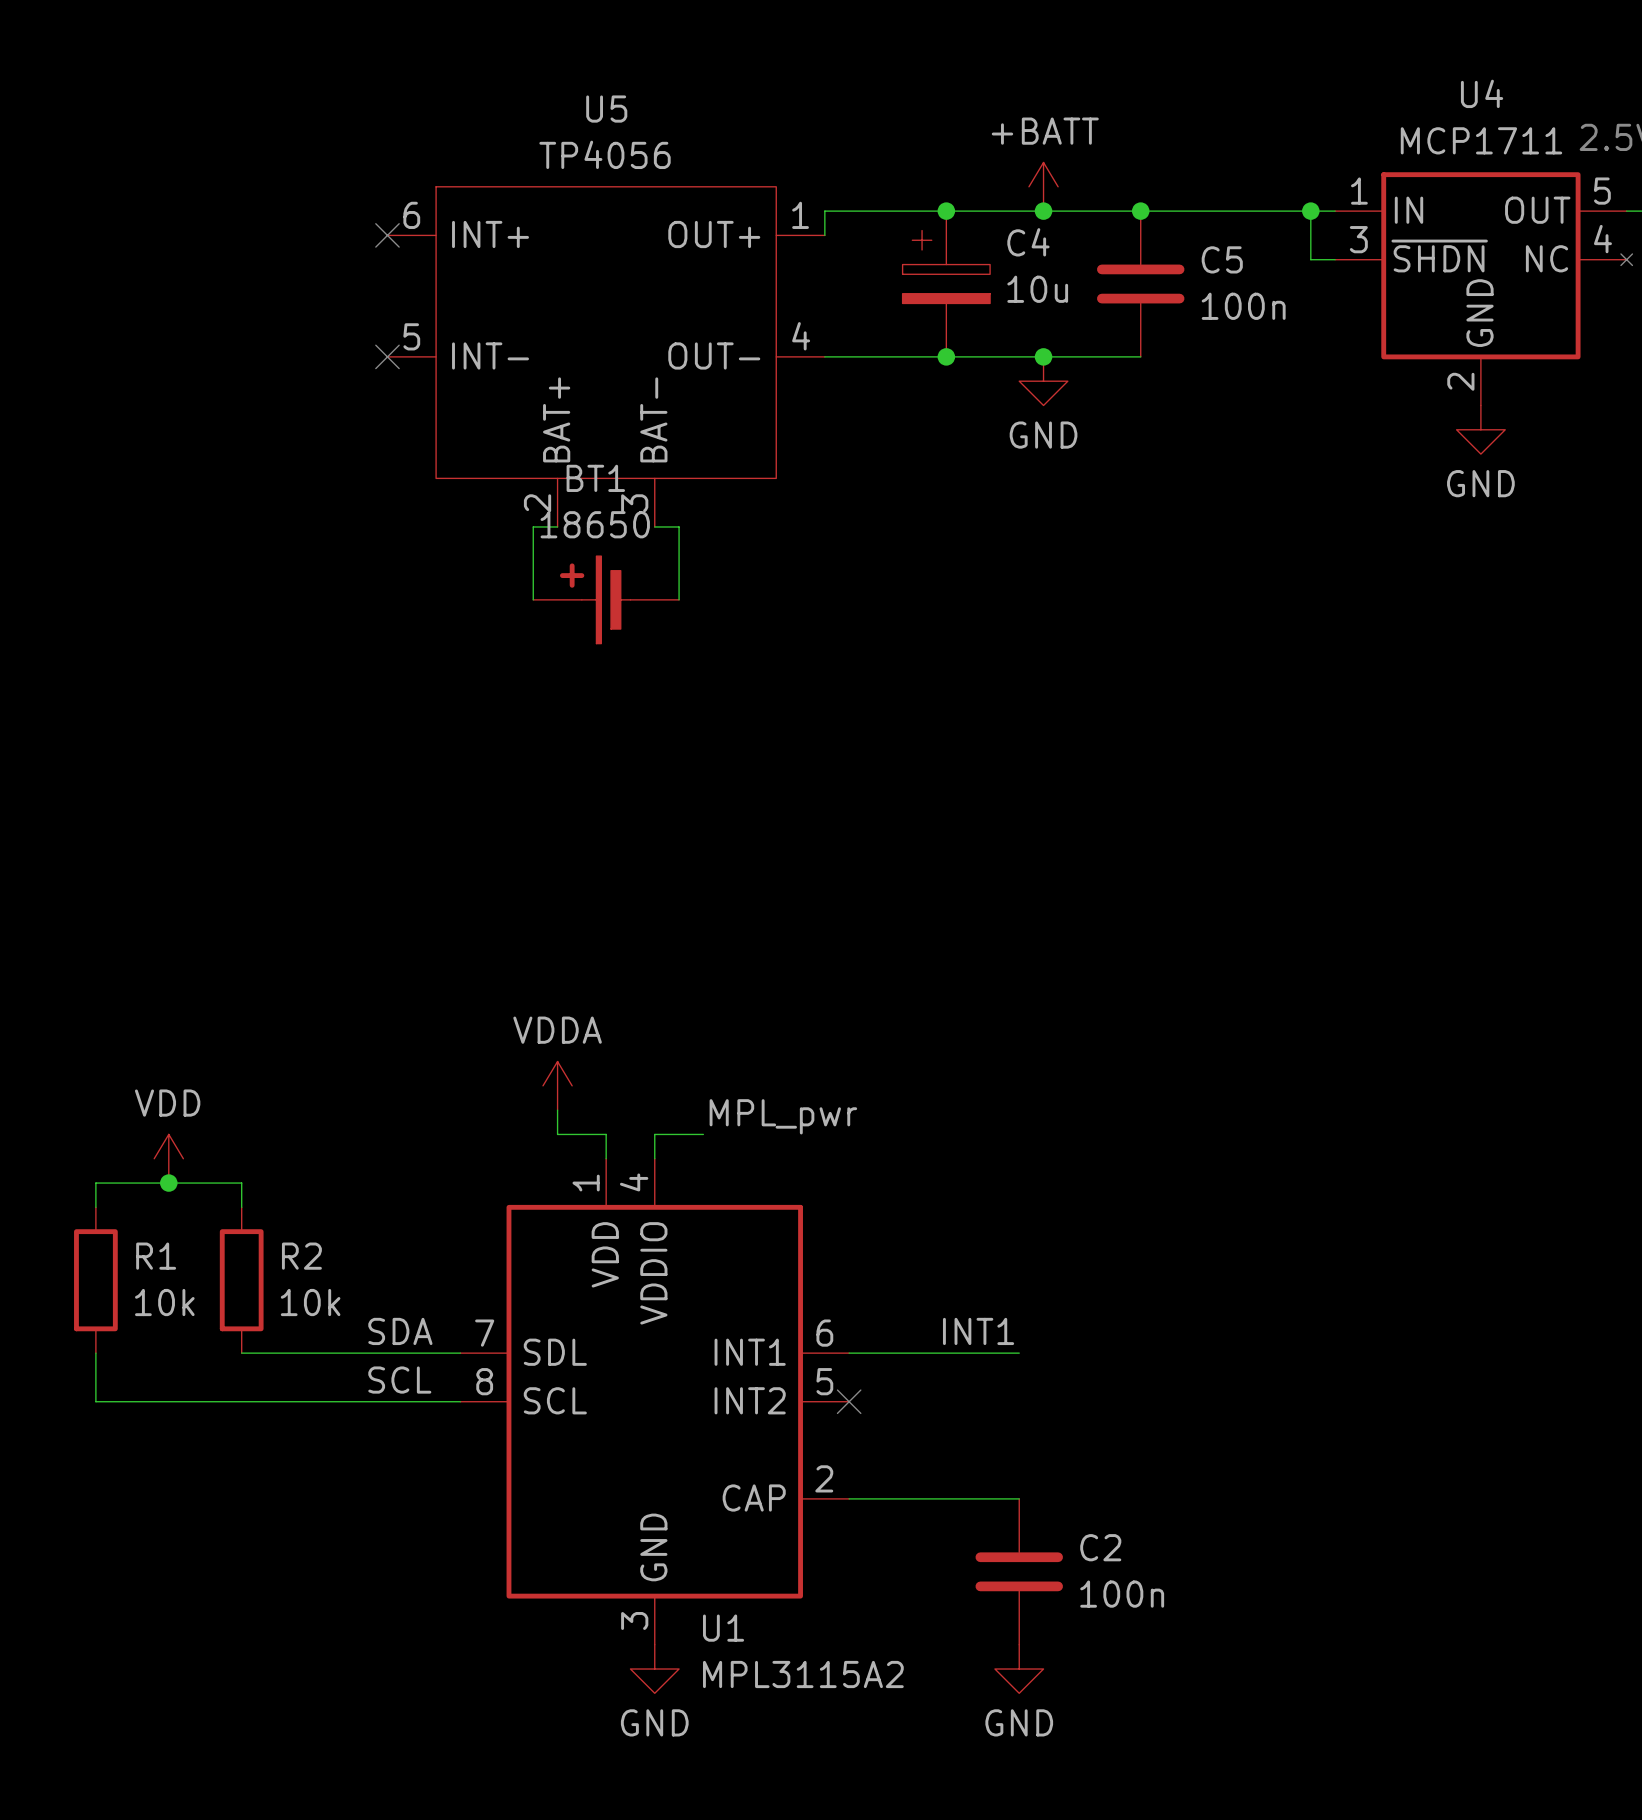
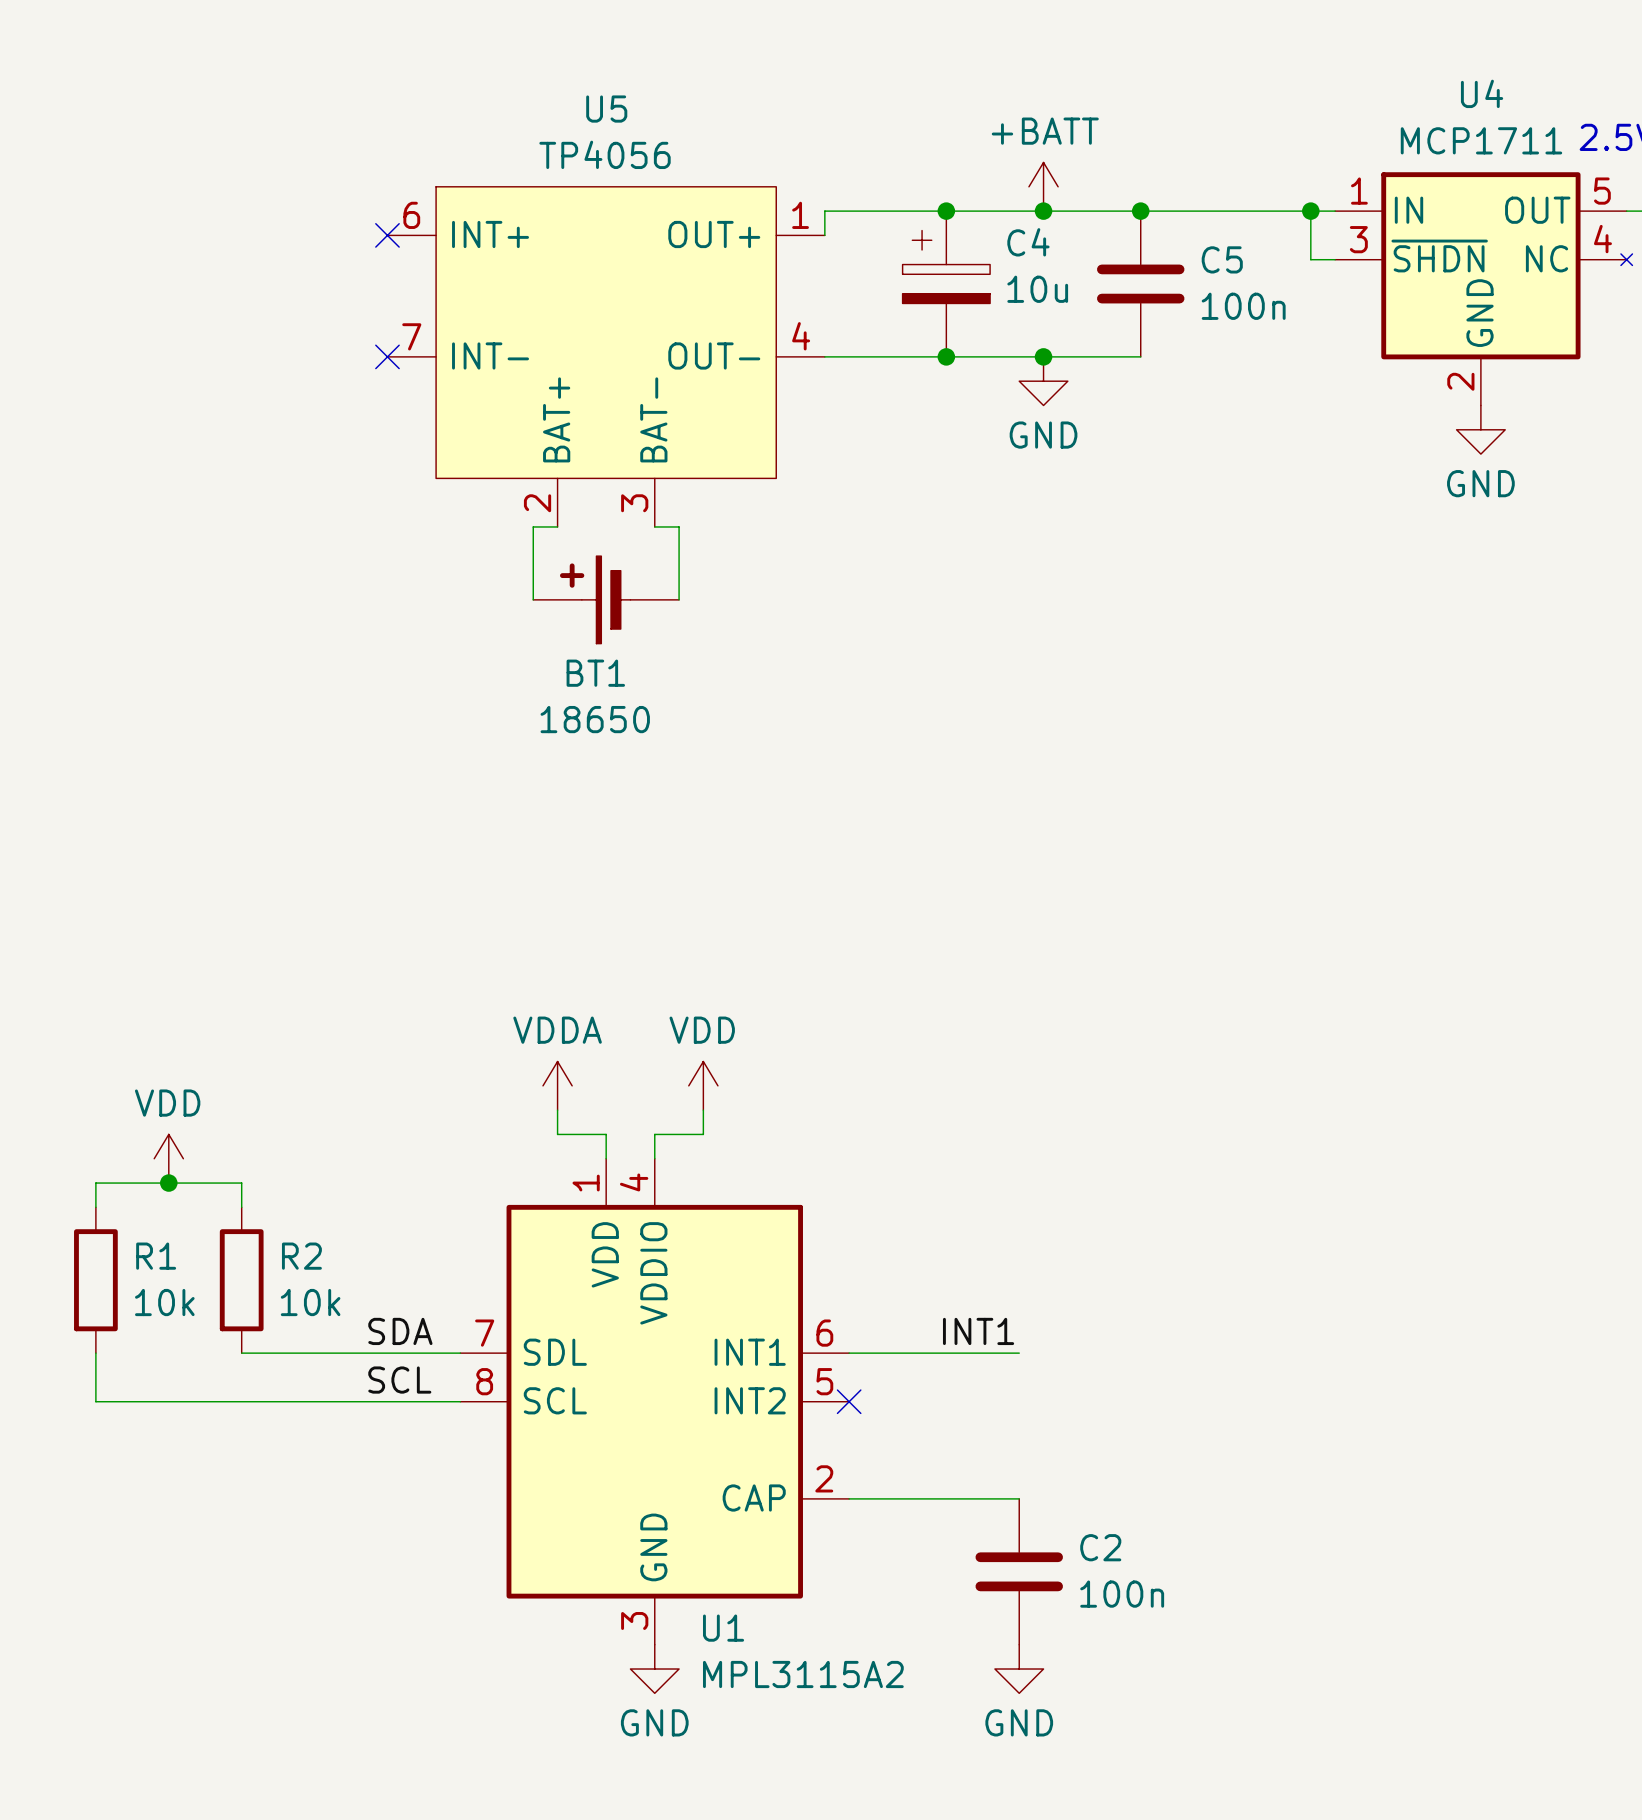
U5 pin number: 5 (411, 336) -> 7 (411, 336)
BT1 name position: BT1 (595, 478) -> BT1 (595, 673)
BT1 value position: 18650 (595, 524) -> 18650 (595, 719)
power symbol: none -> VDD (703, 1085)
wire: none -> (703, 1110) (703, 1134)
label: MPL_pwr (783, 1116) -> none

